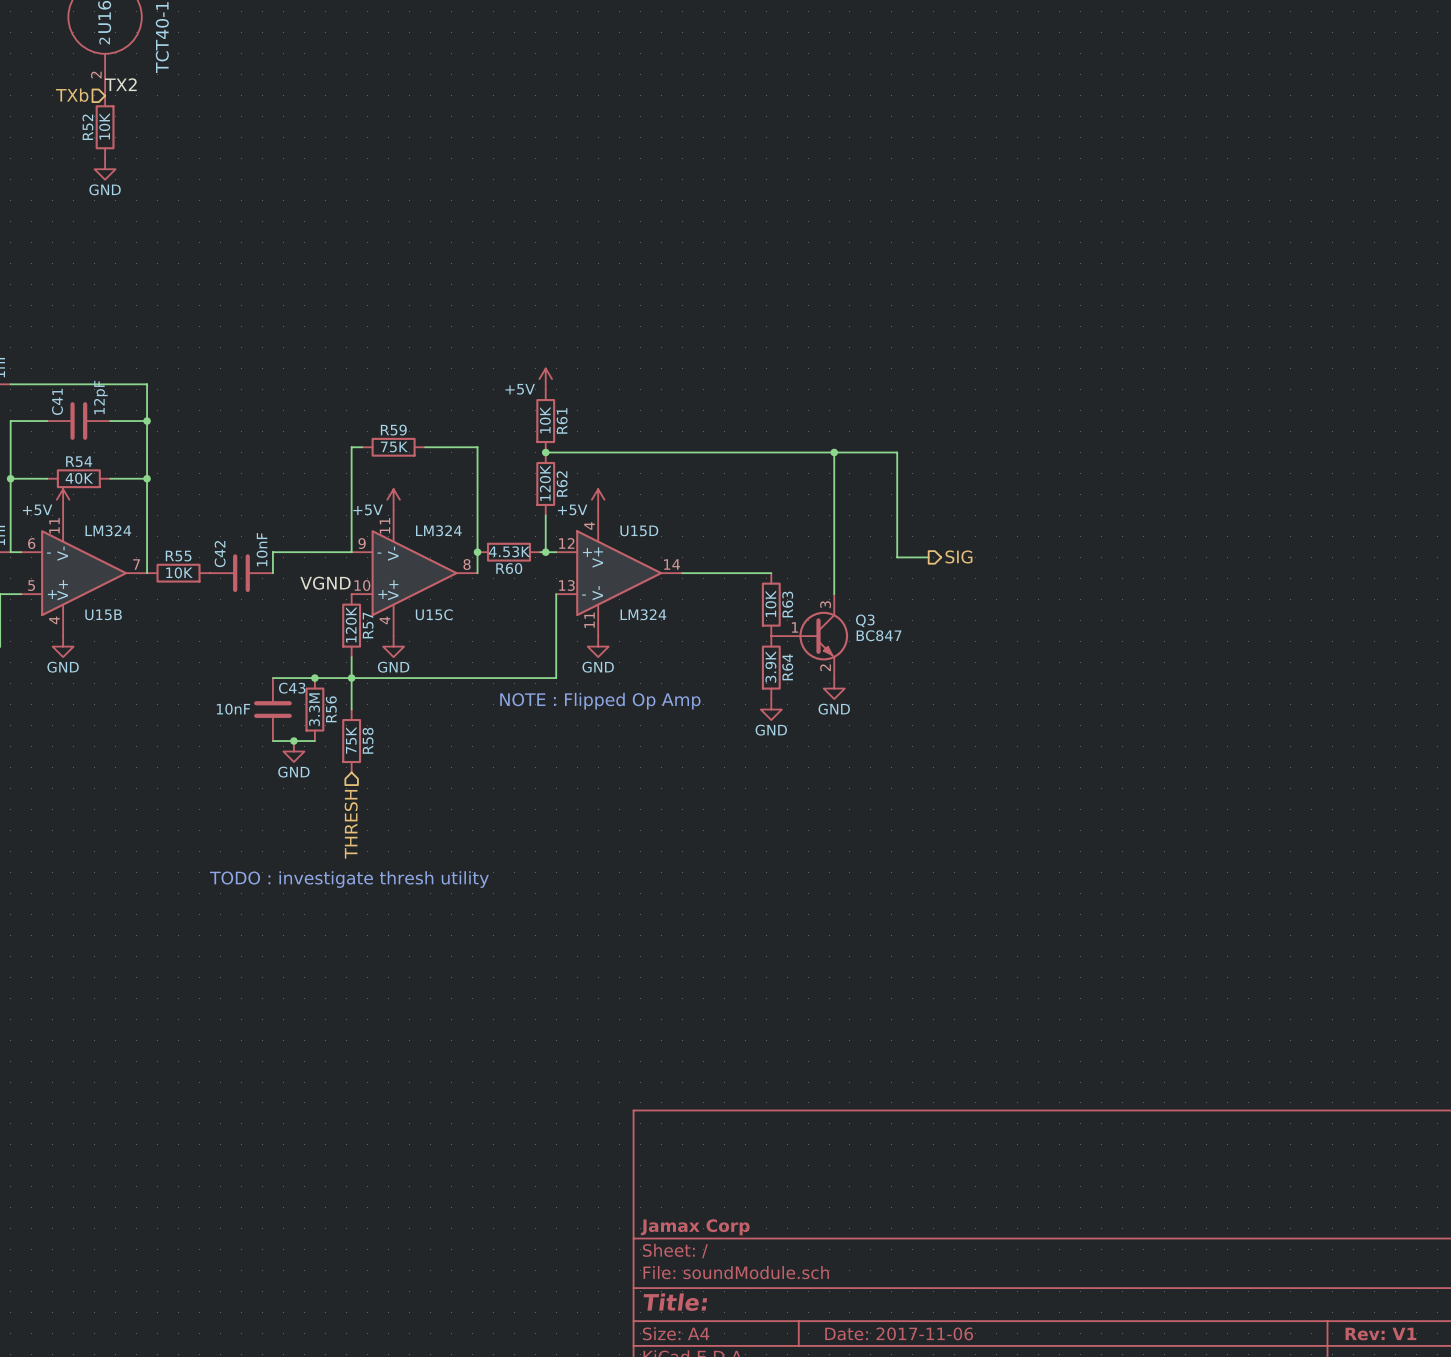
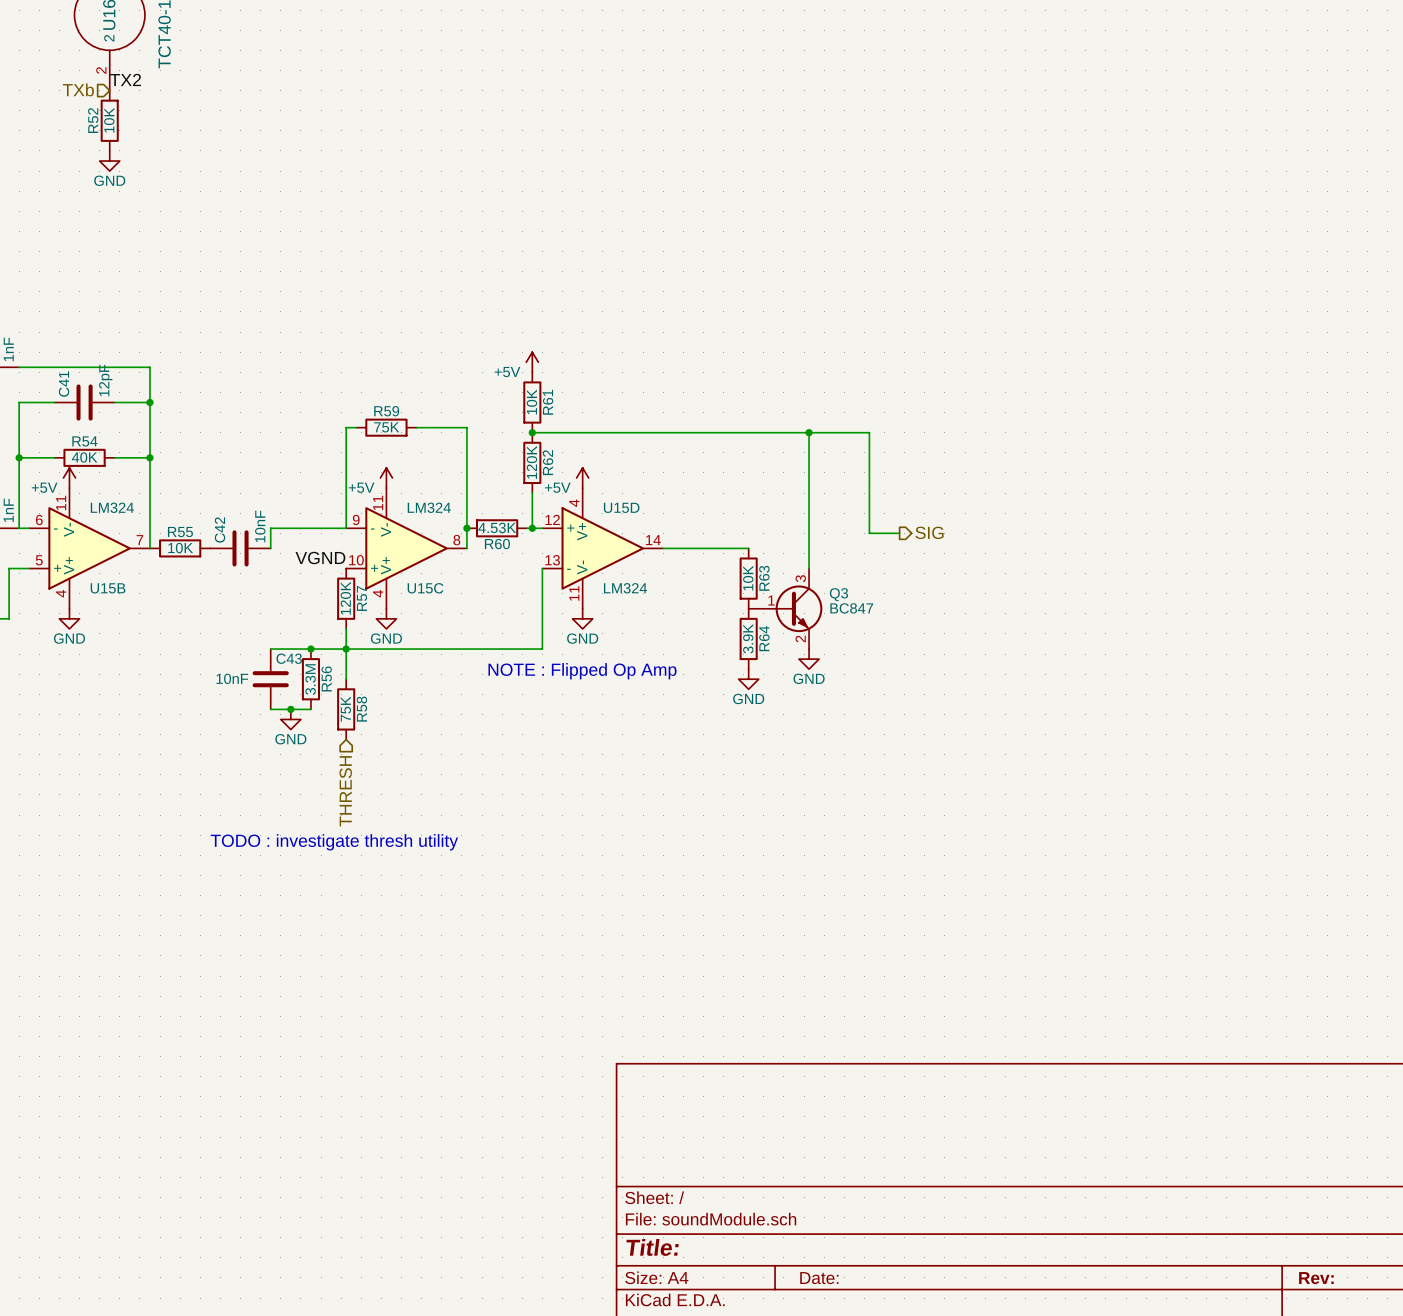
title block: Jamax Corp (695, 1227) -> none
title block: Date: 2017-11-06 (899, 1333) -> Date: (819, 1278)
title block: Rev: V1 (1380, 1334) -> Rev: (1316, 1278)

